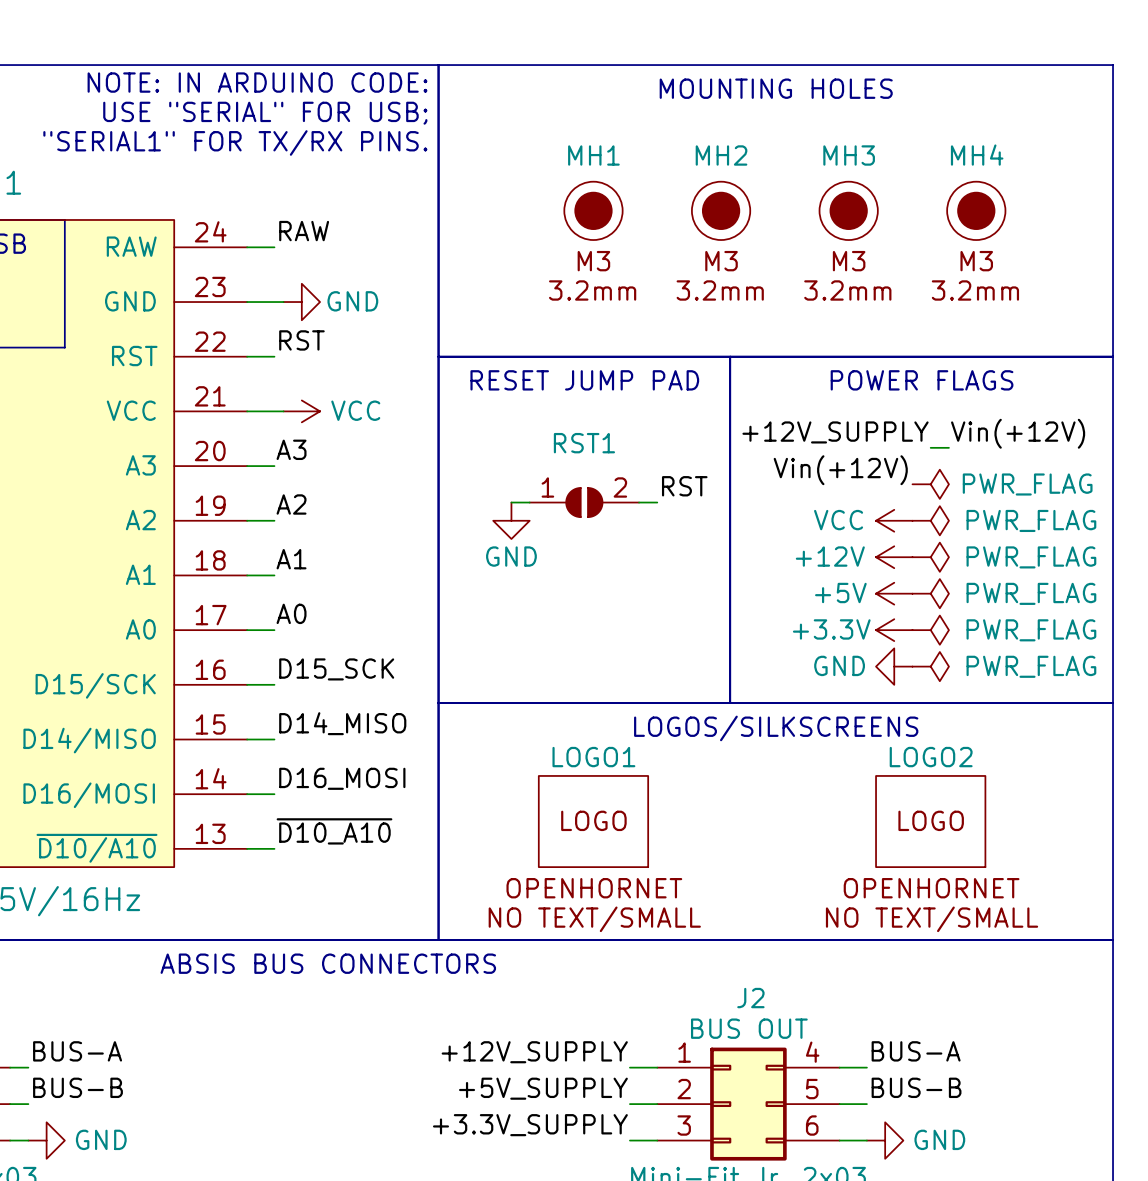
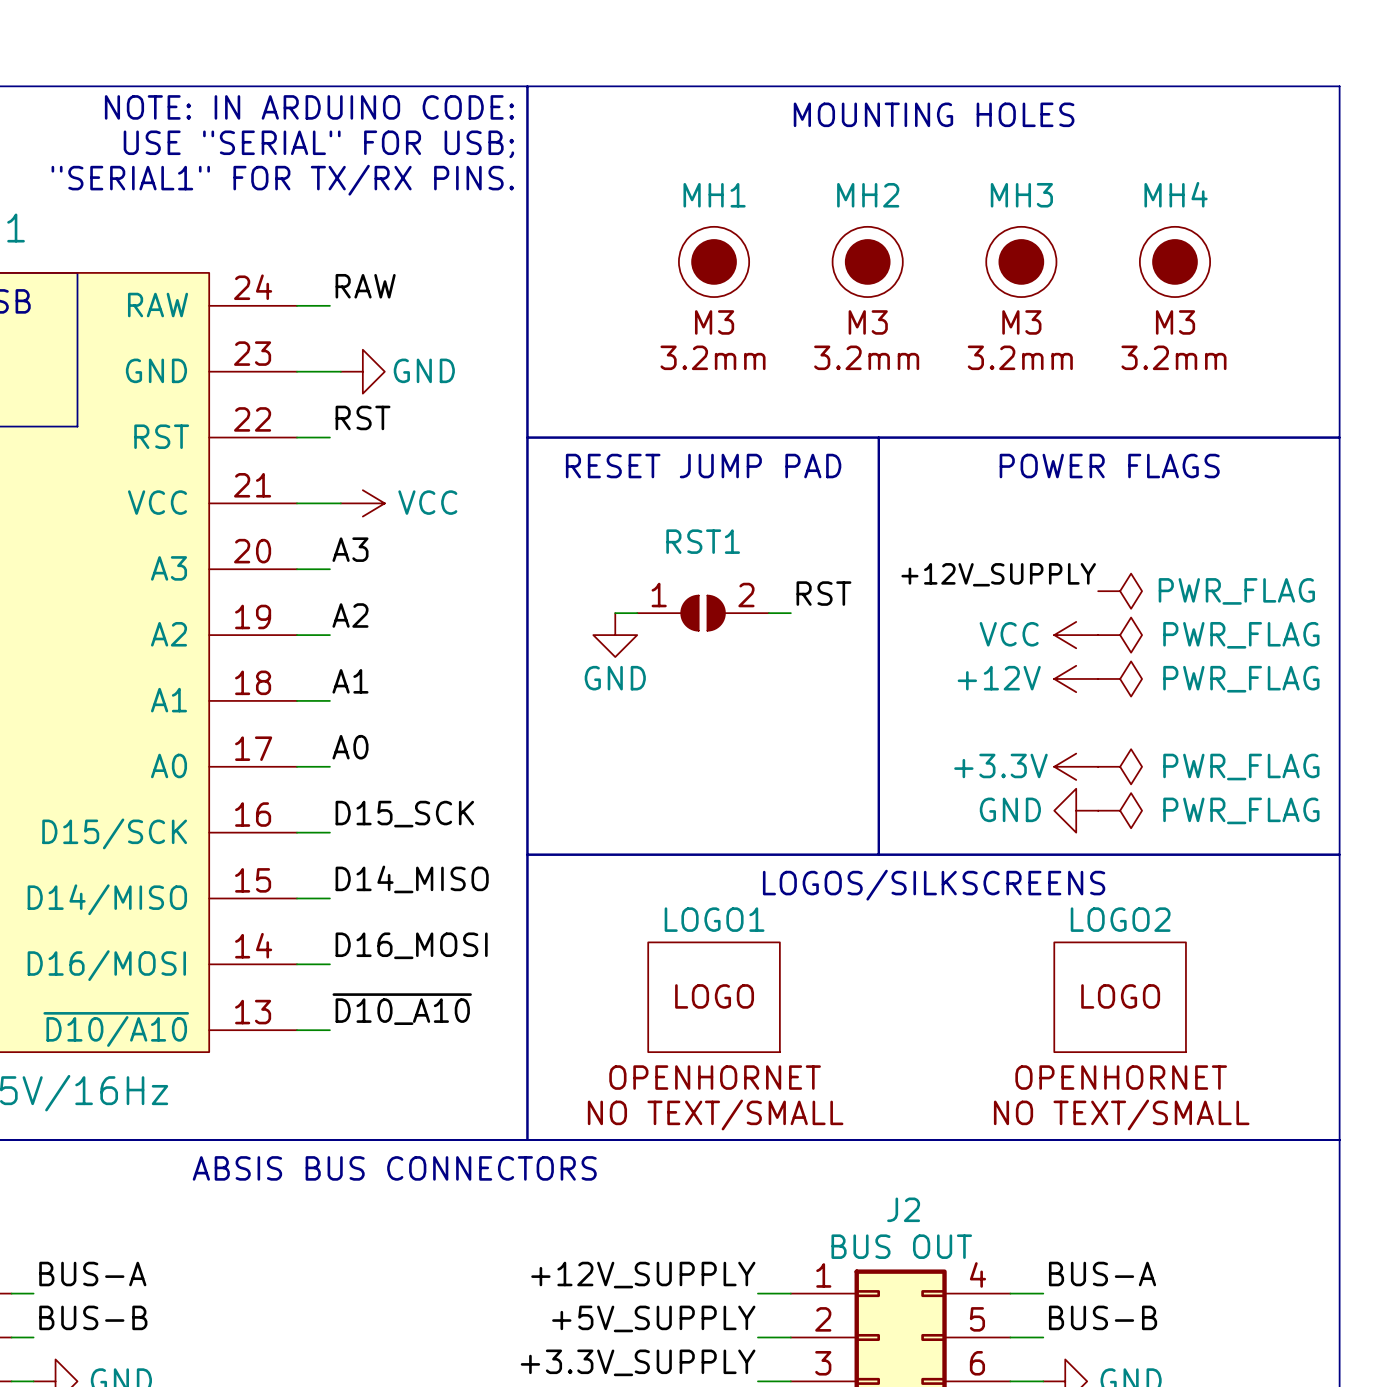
label: +12V_SUPPLY (835, 432) -> none
label: Vin(+12V) (1018, 433) -> none
wire: (930, 447) (948, 447) -> none
label: Vin(+12V) (840, 470) -> +12V_SUPPLY (998, 574)
power symbol: +5V (894, 593) -> none
power symbol: PWR_FLAG (930, 593) -> none

